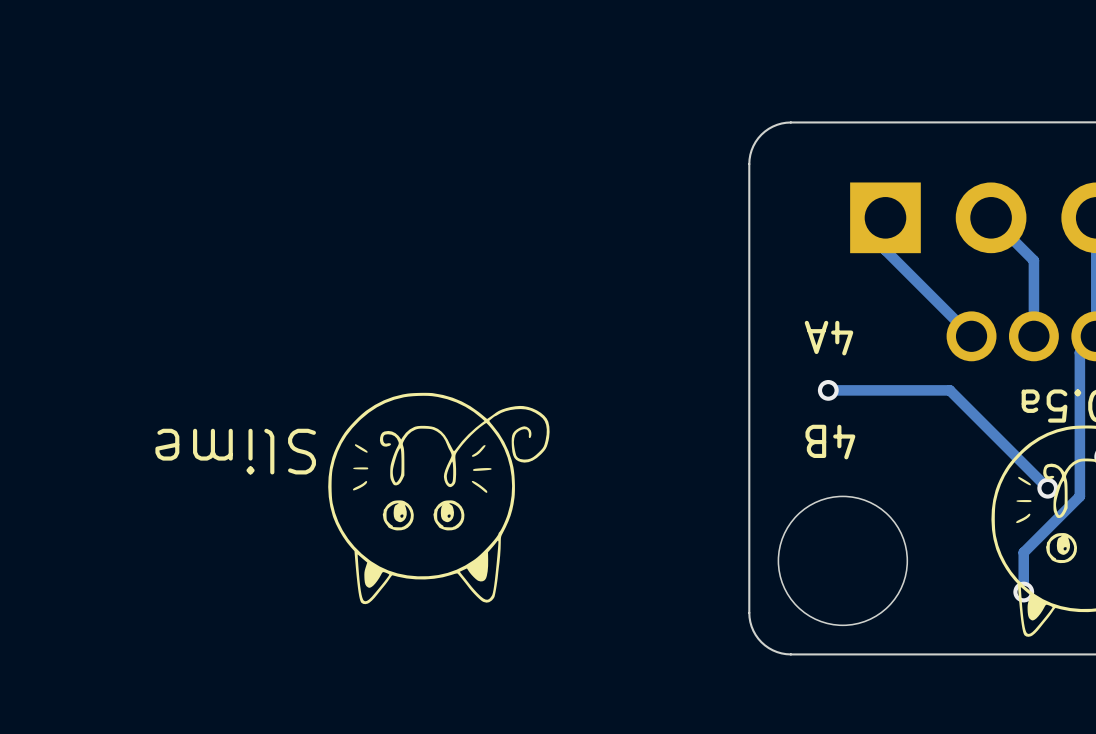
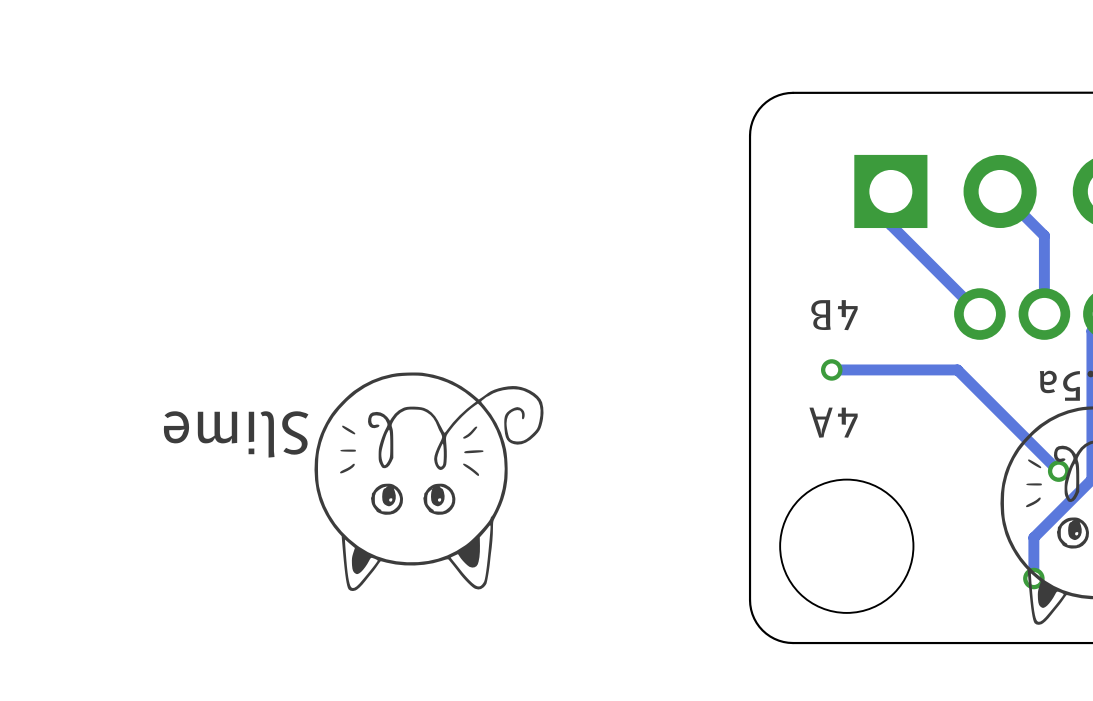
text: 4A (828, 338) -> 4B (834, 315)
text: 4B (830, 442) -> 4A (833, 422)

